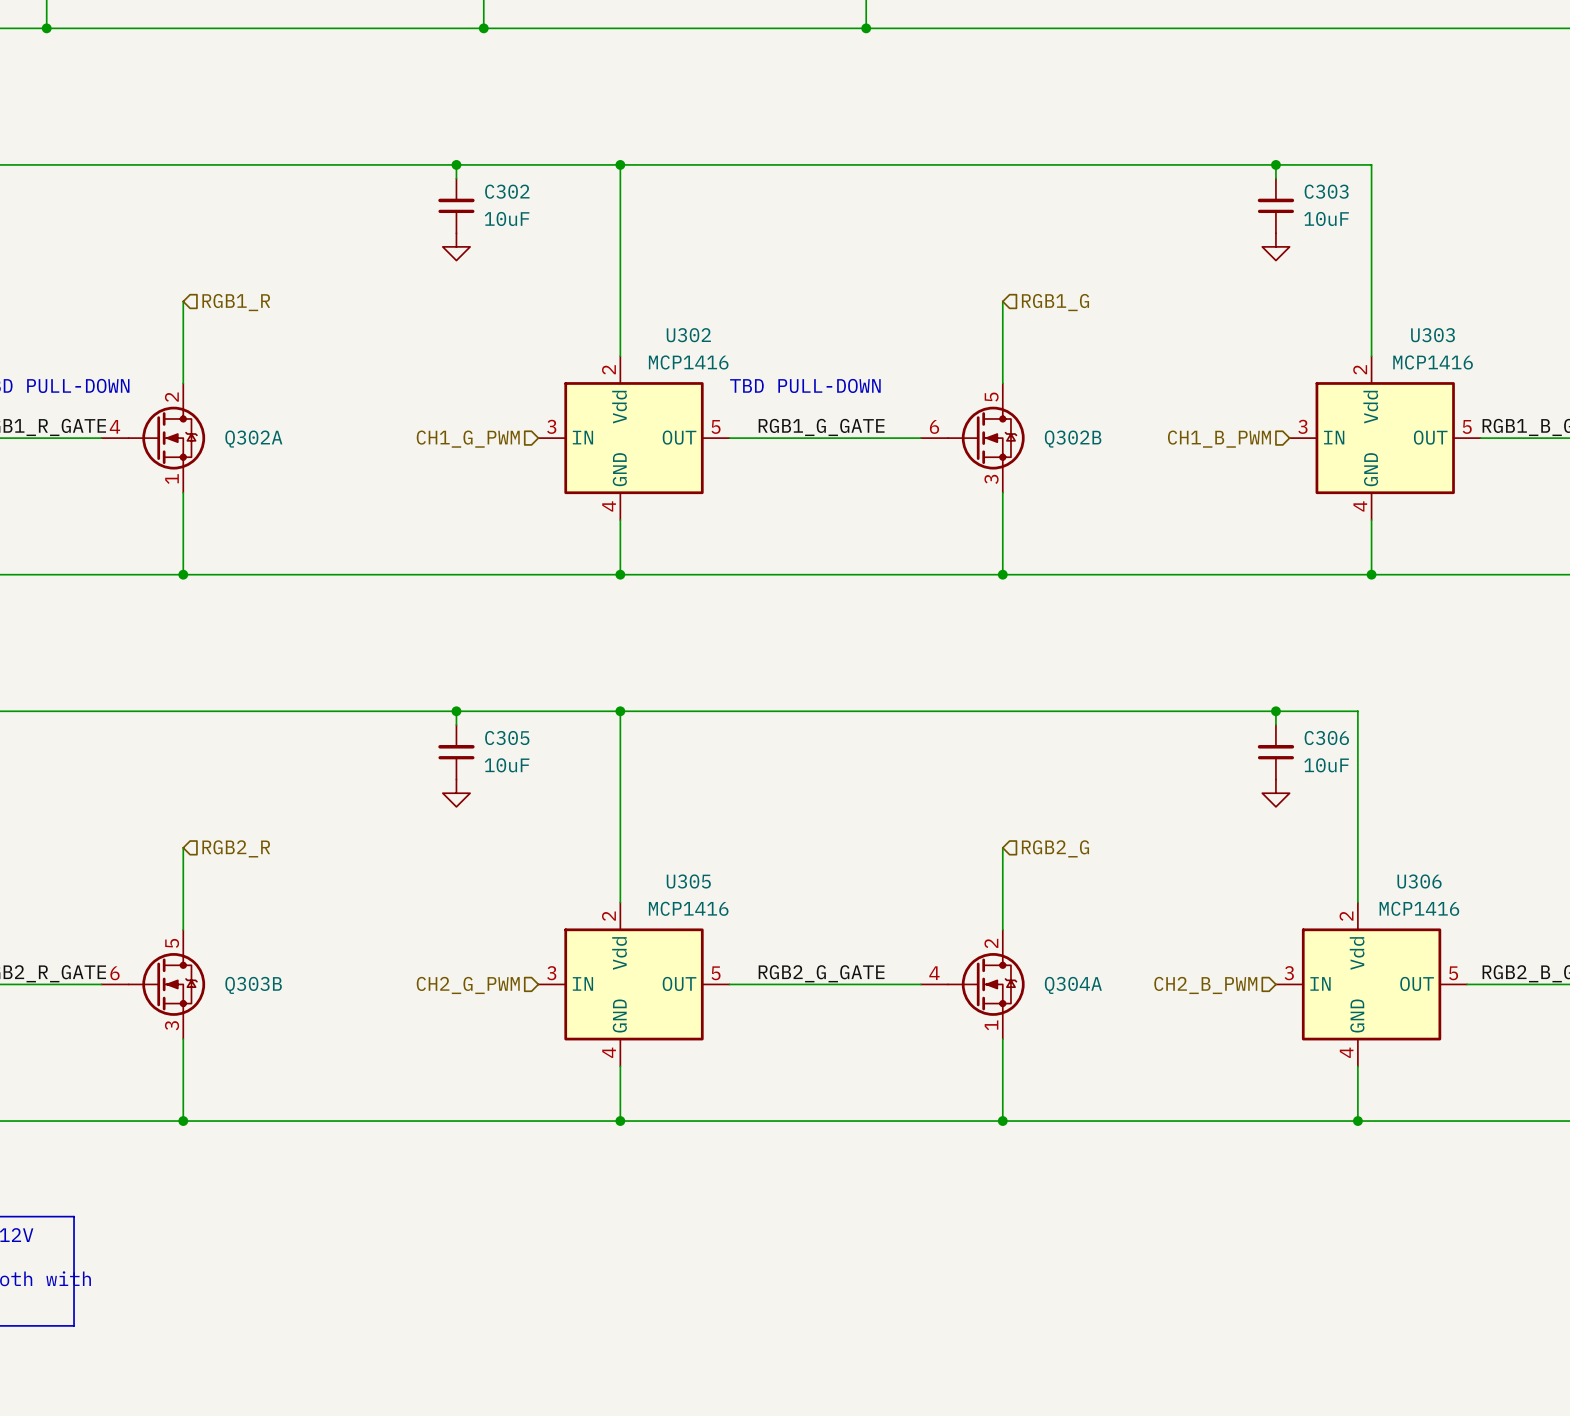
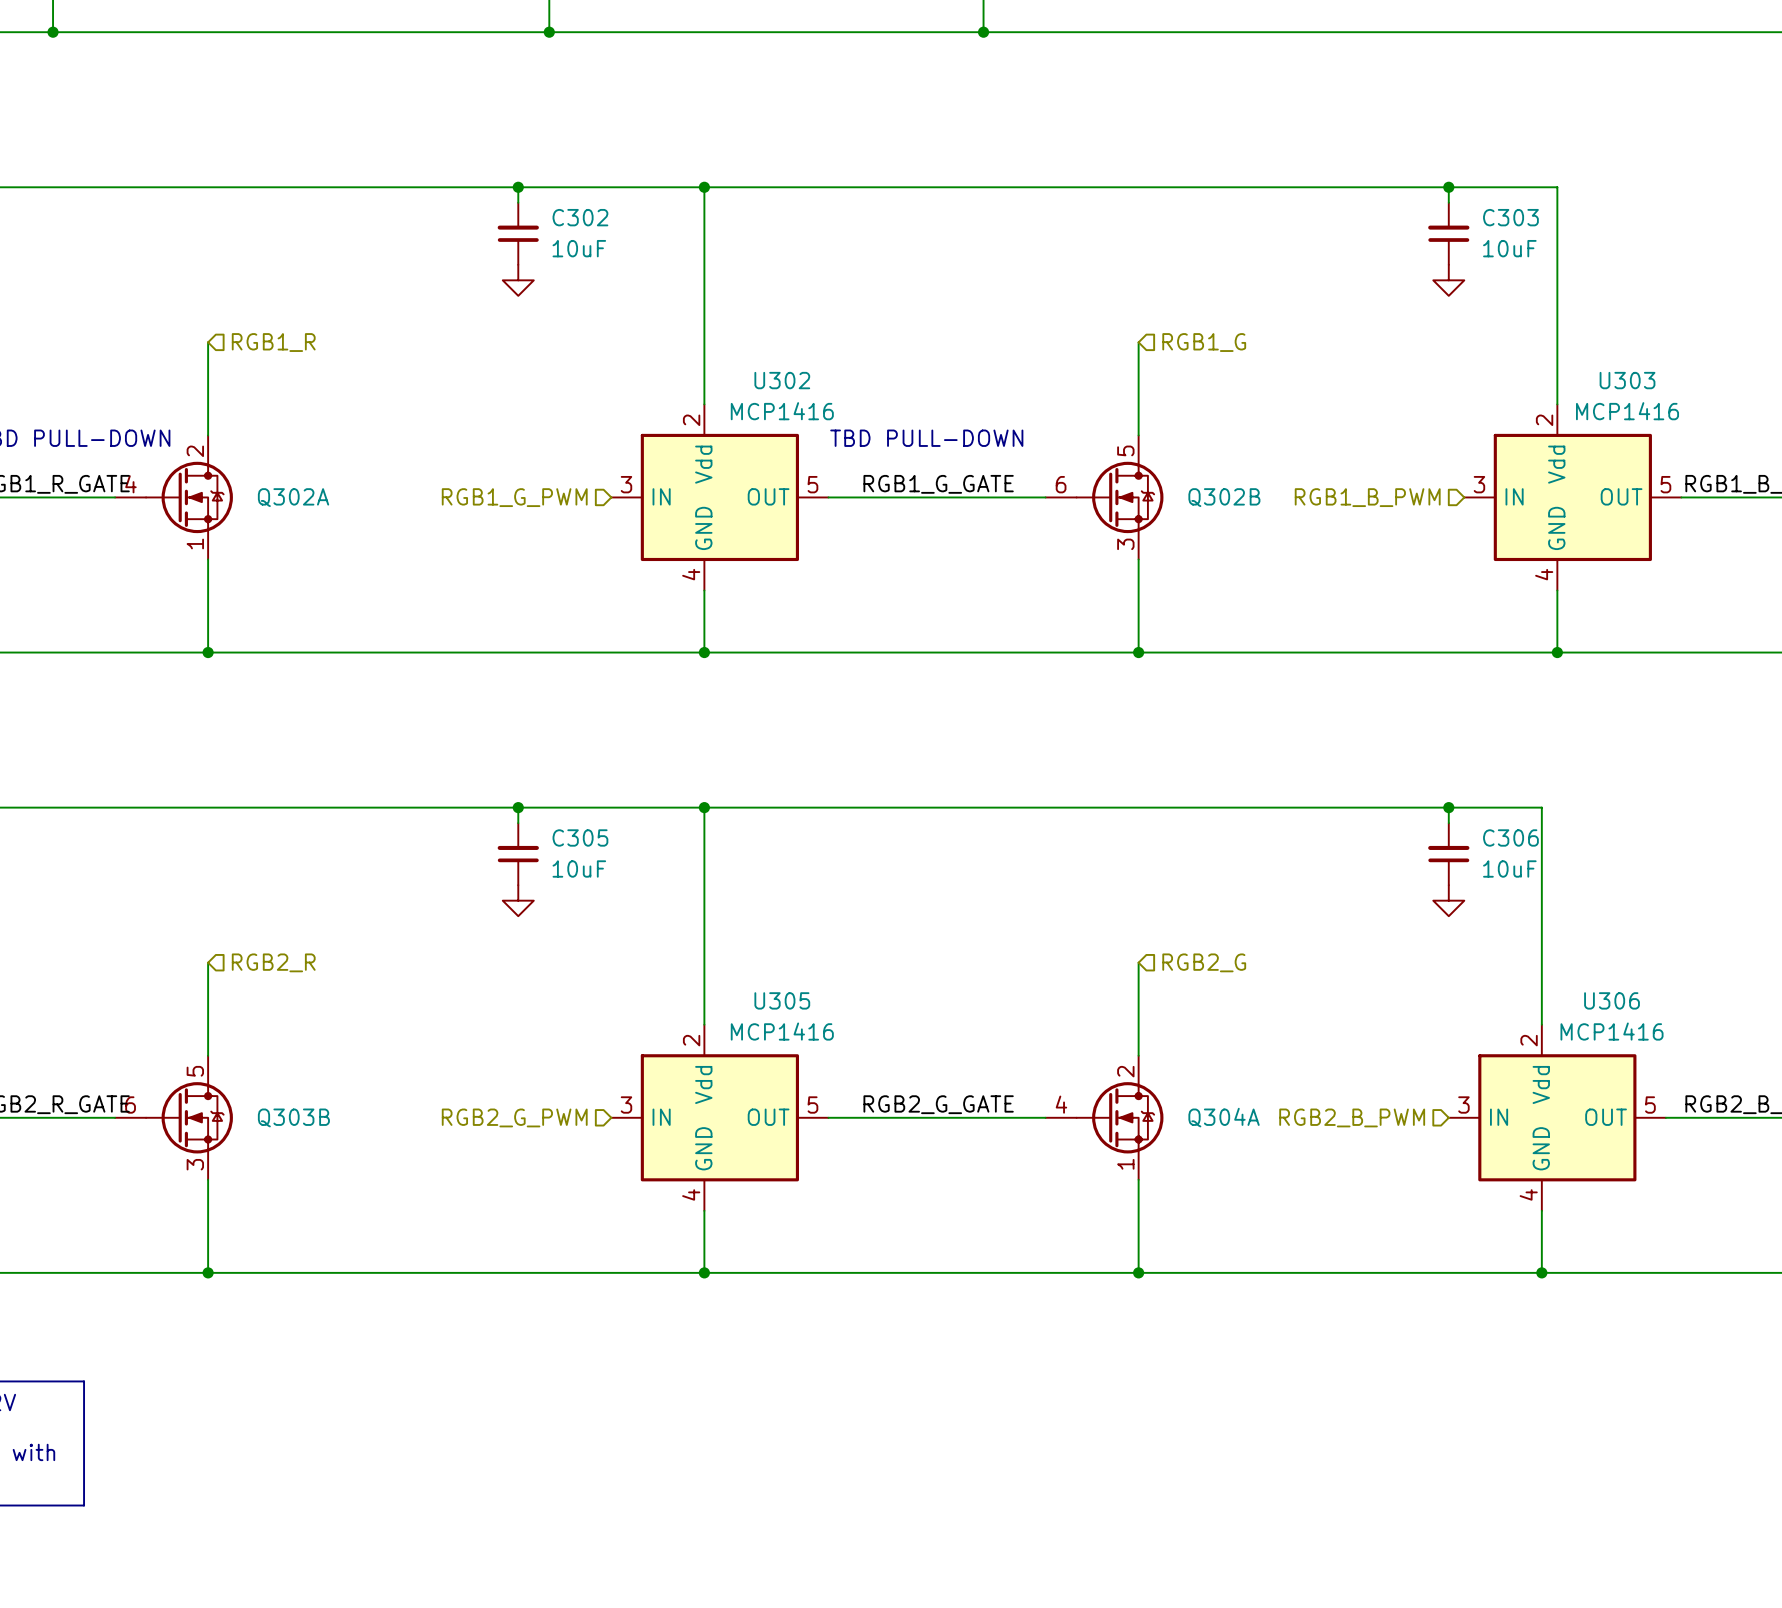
hierarchical label: CH1_G_PWM (468, 439) -> RGB1_G_PWM (514, 497)
hierarchical label: CH1_B_PWM (1219, 439) -> RGB1_B_PWM (1367, 497)
hierarchical label: CH2_G_PWM (468, 985) -> RGB2_G_PWM (514, 1117)
hierarchical label: CH2_B_PWM (1205, 985) -> RGB2_B_PWM (1352, 1117)

